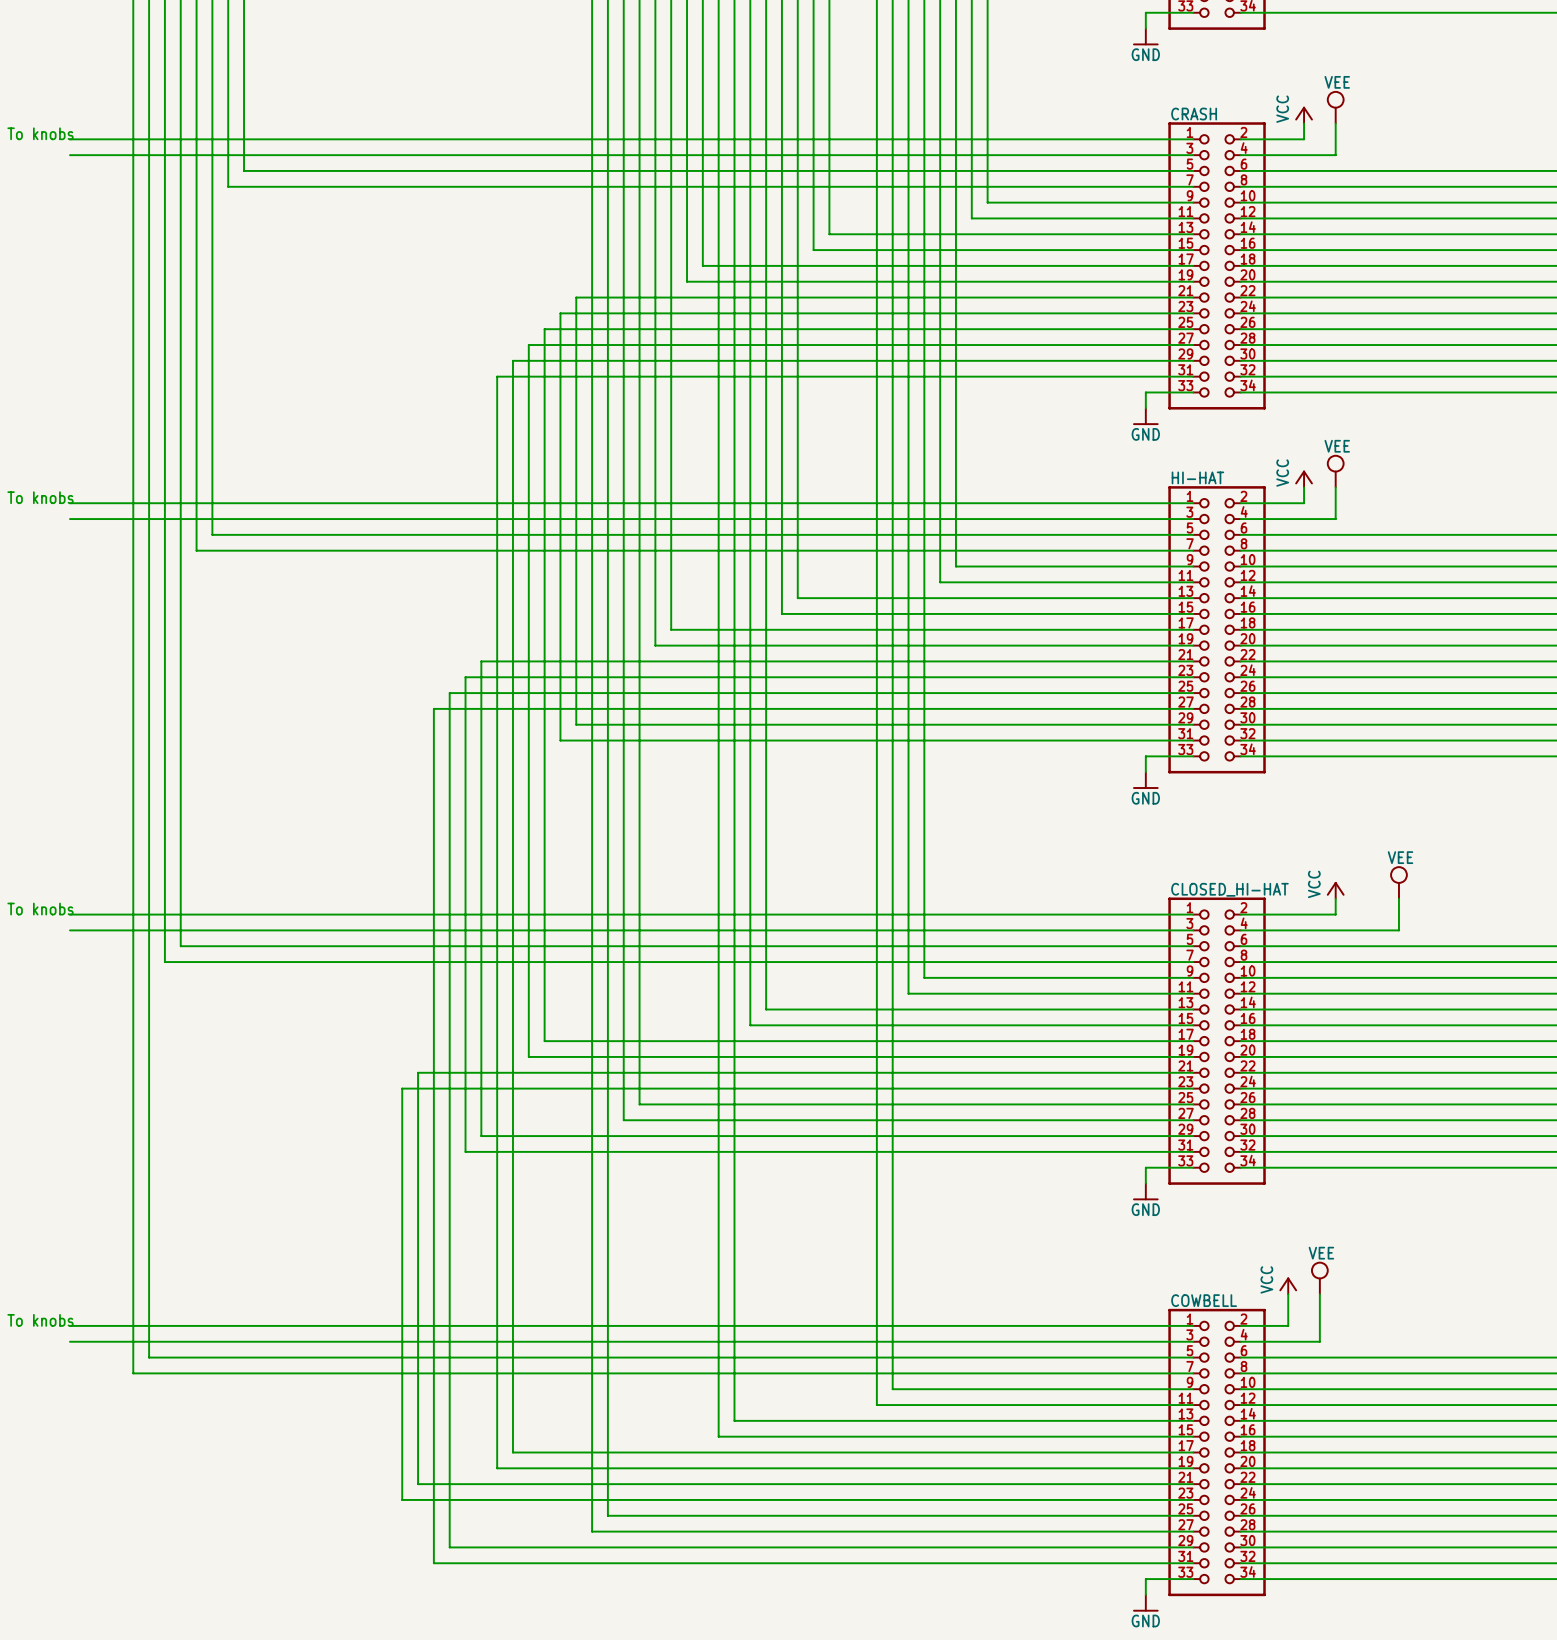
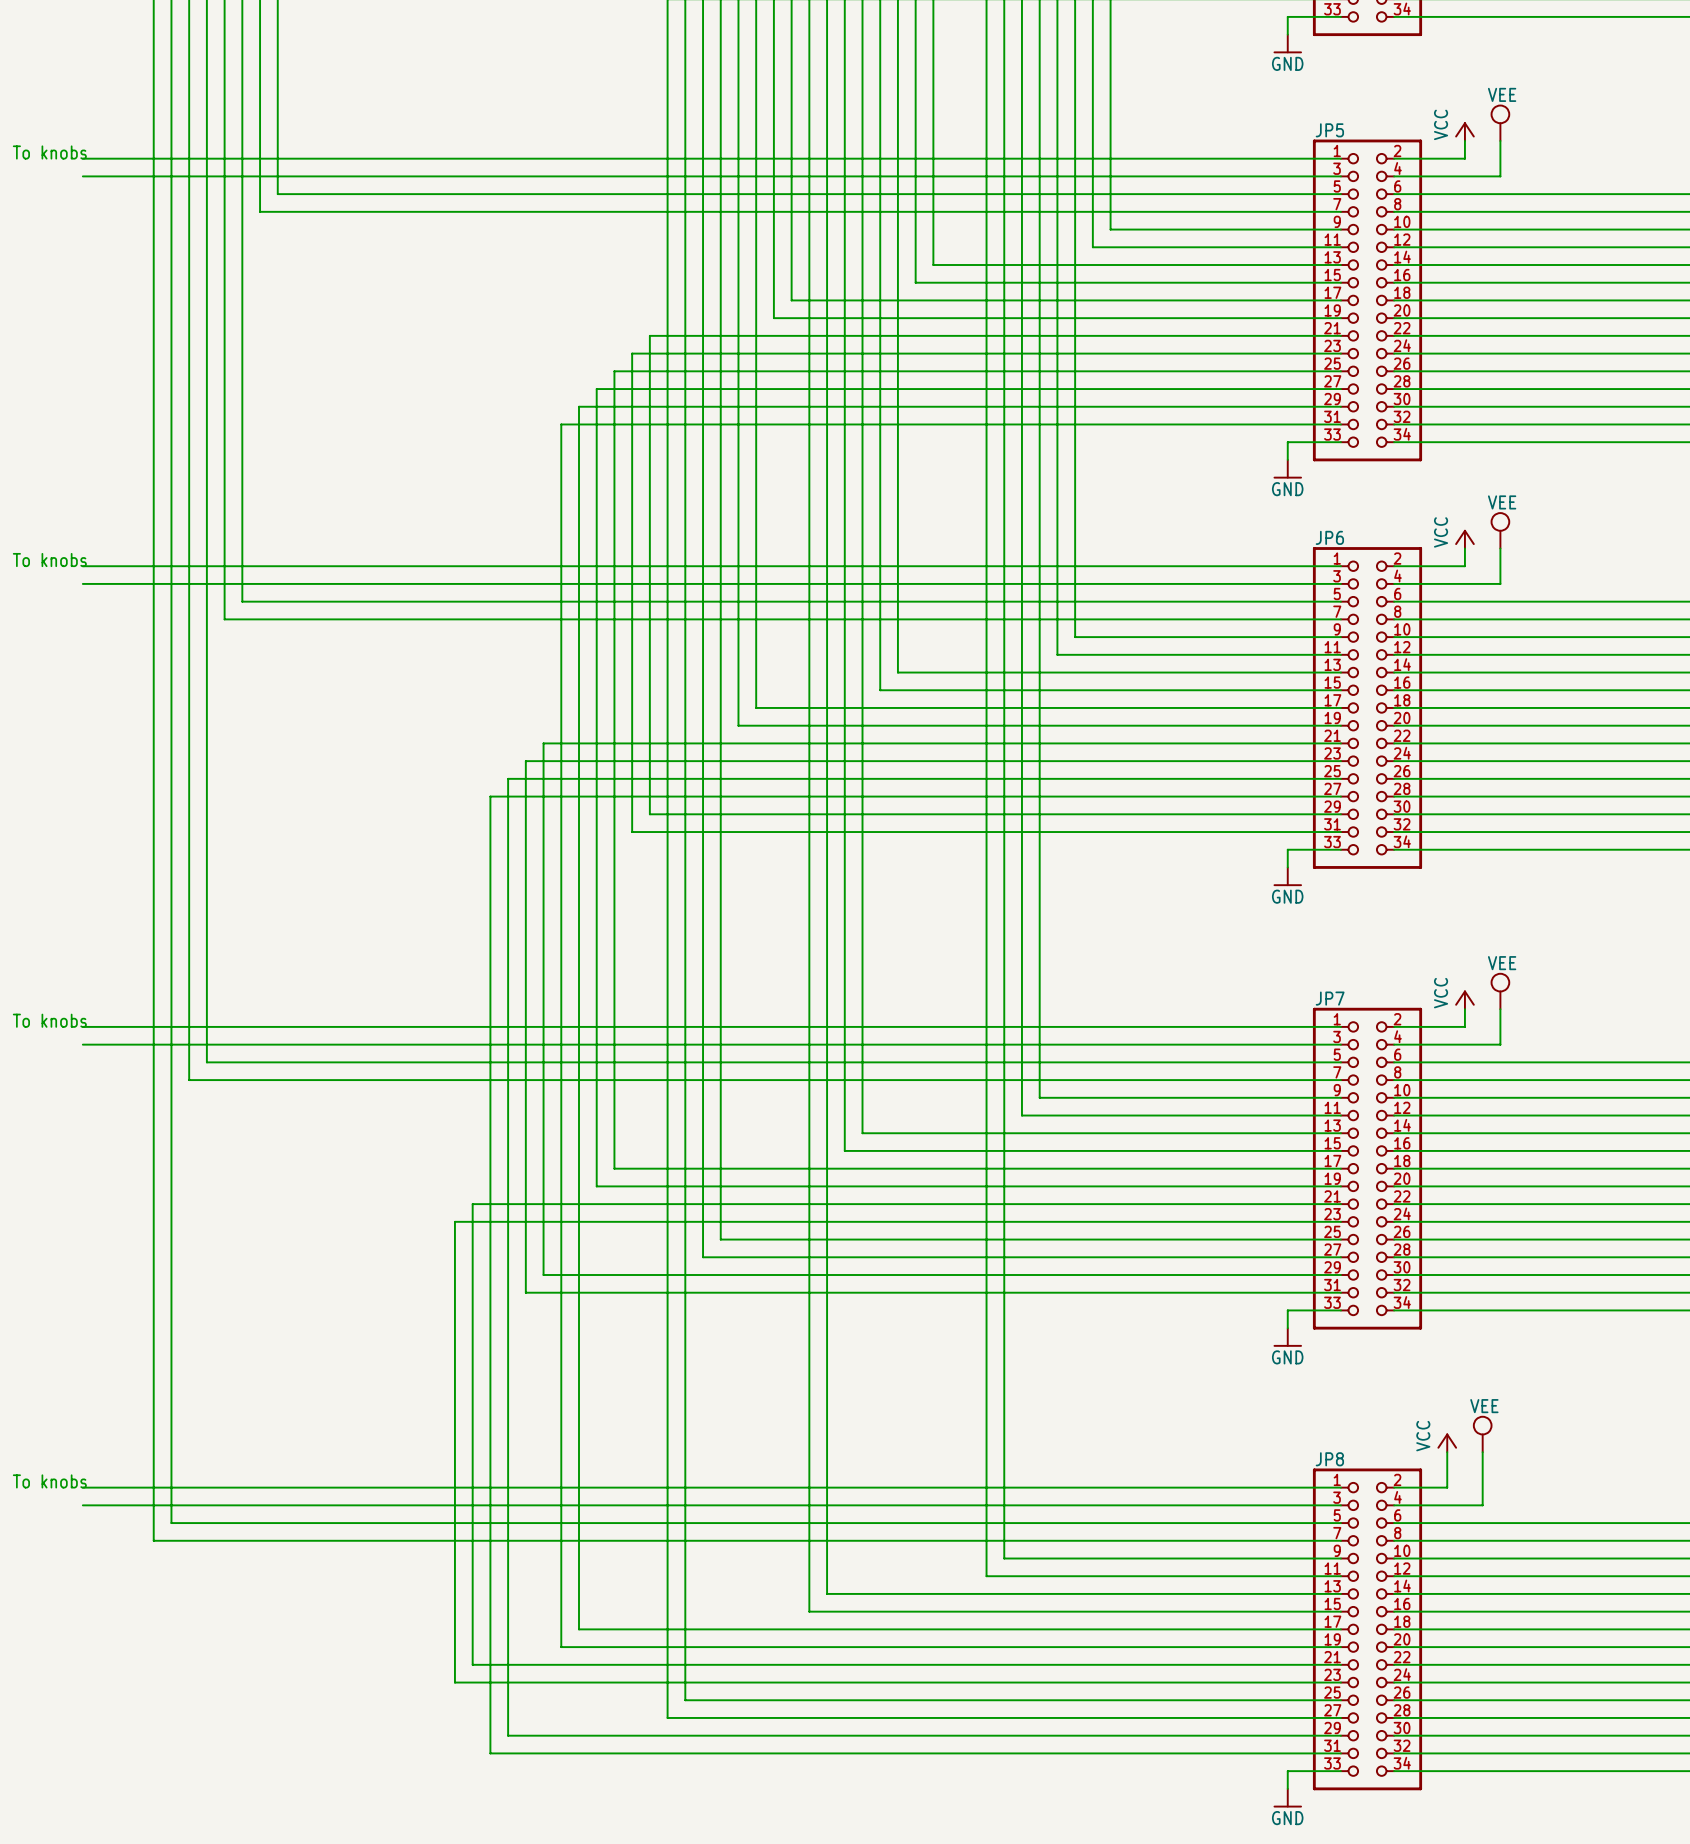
CRASH name: CRASH (1194, 114) -> JP5 (1329, 130)
HI-HAT name: HI-HAT (1197, 477) -> JP6 (1329, 537)
power symbol position: VEE (1398, 882) -> VEE (1500, 991)
CLOSED_HI-HAT name: CLOSED_HI-HAT (1229, 889) -> JP7 (1330, 998)
power symbol position: VCC (1335, 890) -> VCC (1464, 999)
wire: (1398, 898) (1398, 930) (1335, 930) -> (1500, 1026) (1500, 1044)
wire: (1304, 914) (1335, 914) -> (1464, 1026) (1464, 1009)
COWBELL name: COWBELL (1204, 1300) -> JP8 (1329, 1459)

